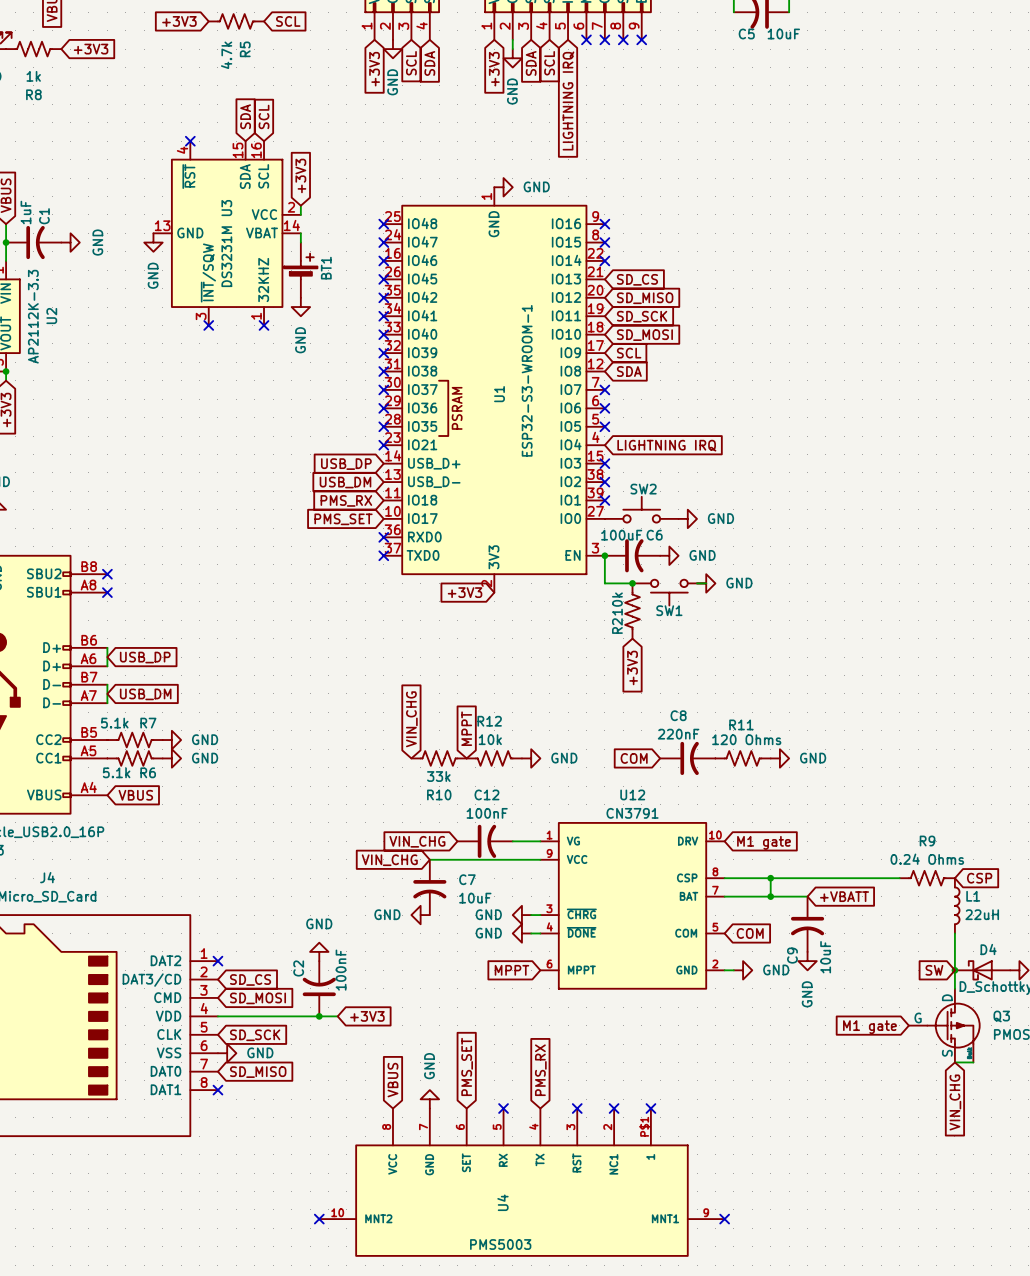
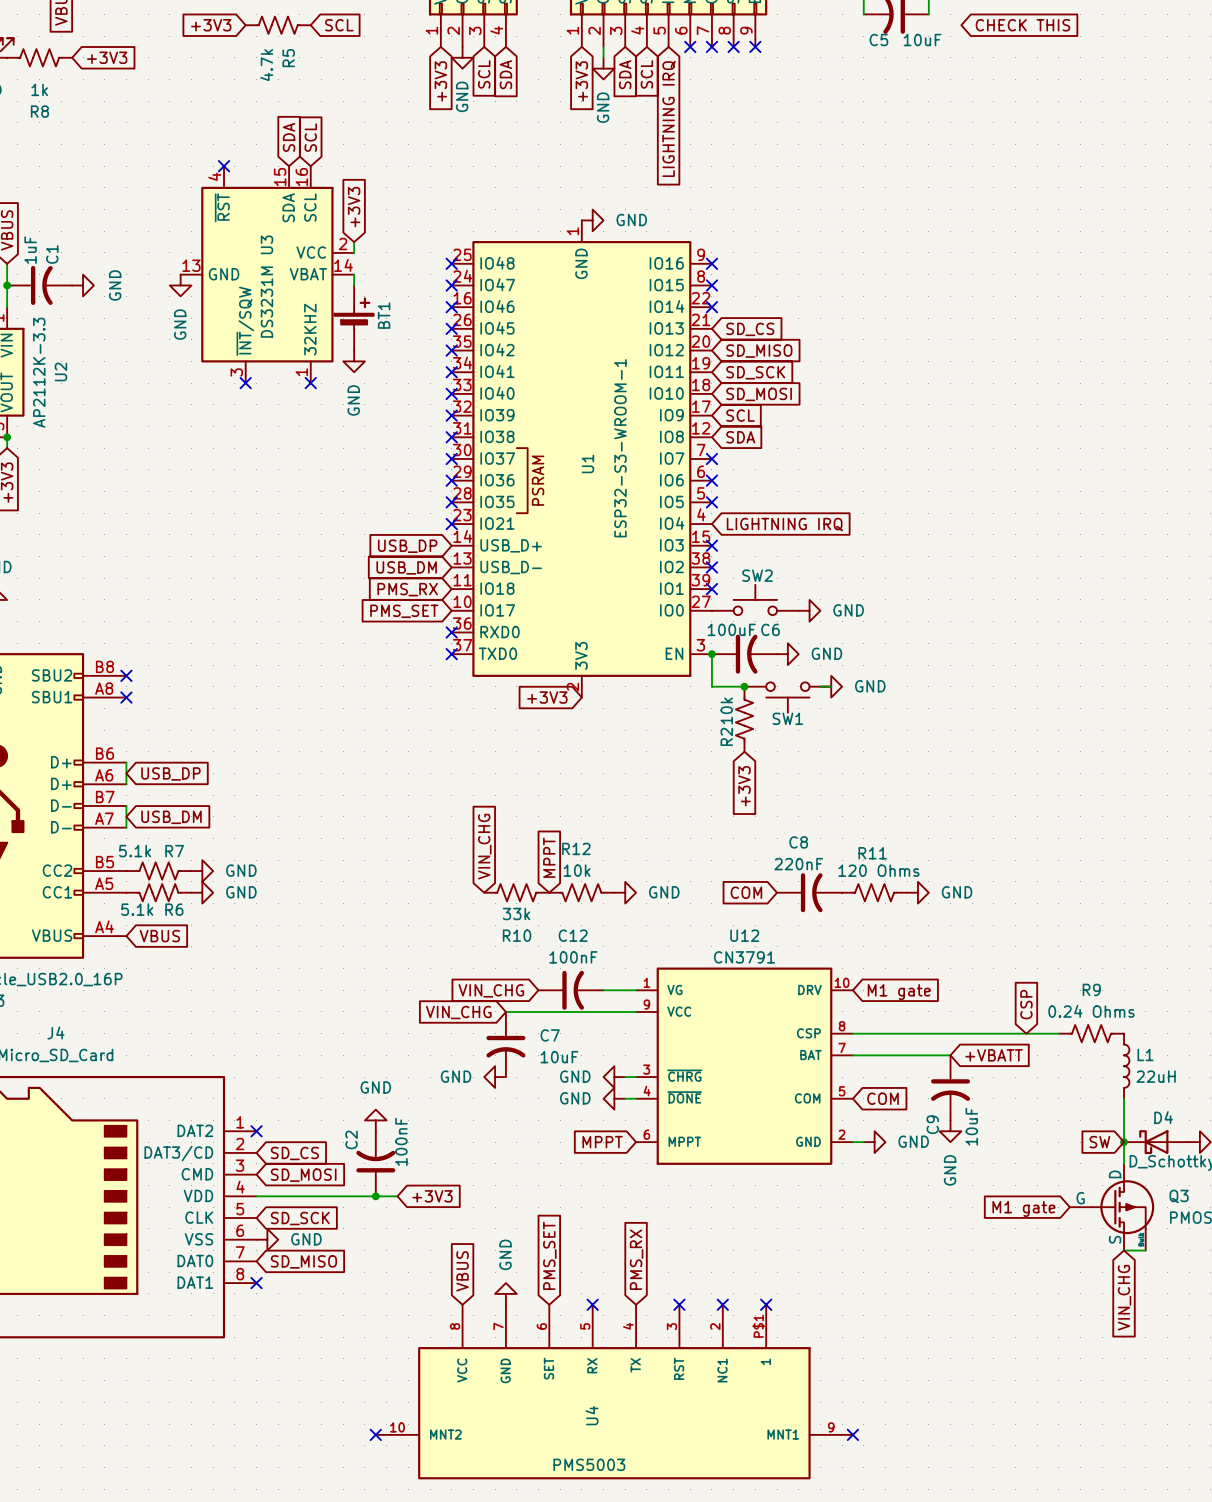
global label: none -> CHECK THIS (1022, 25)
wire: (770, 878) (770, 896) -> none
junction: (770, 878) -> none
global label rotation: 0° (979, 878) -> 90° counterclockwise (1026, 1004)
global label position: CSP (979, 878) -> CSP (1026, 1004)
junction: (770, 896) -> none

